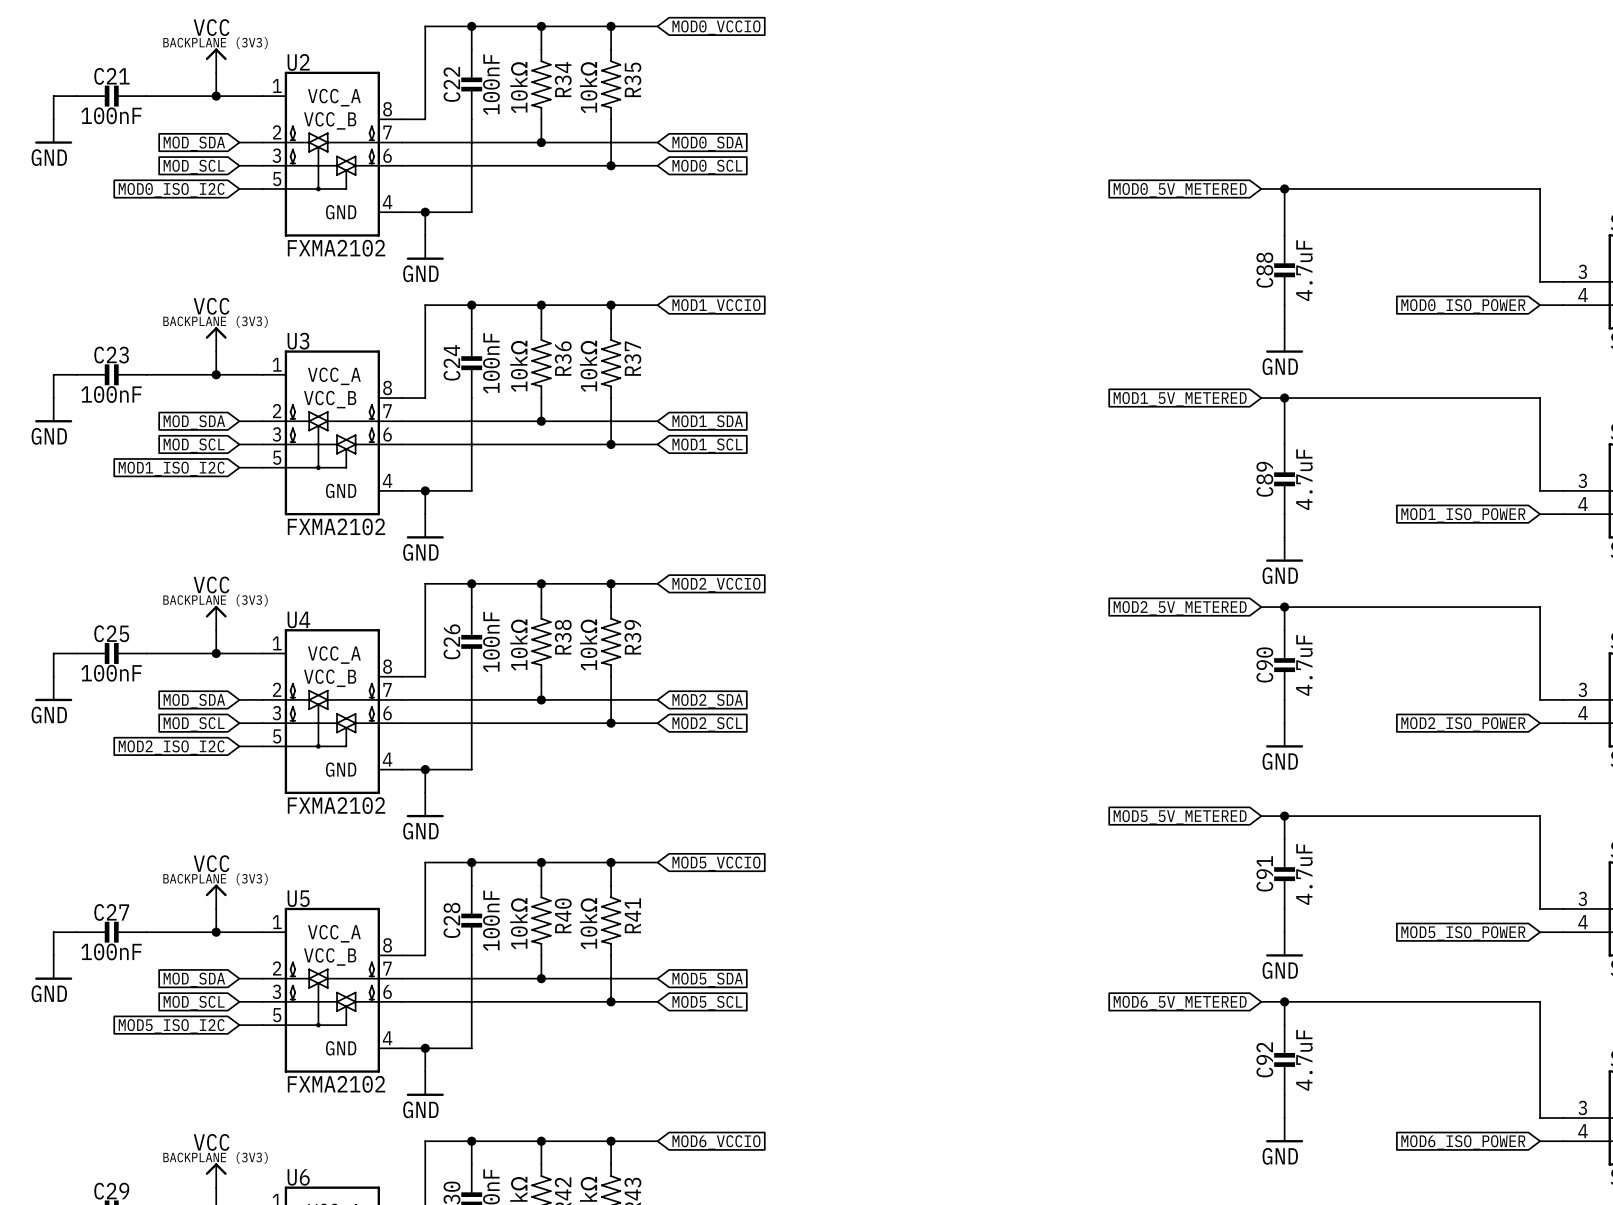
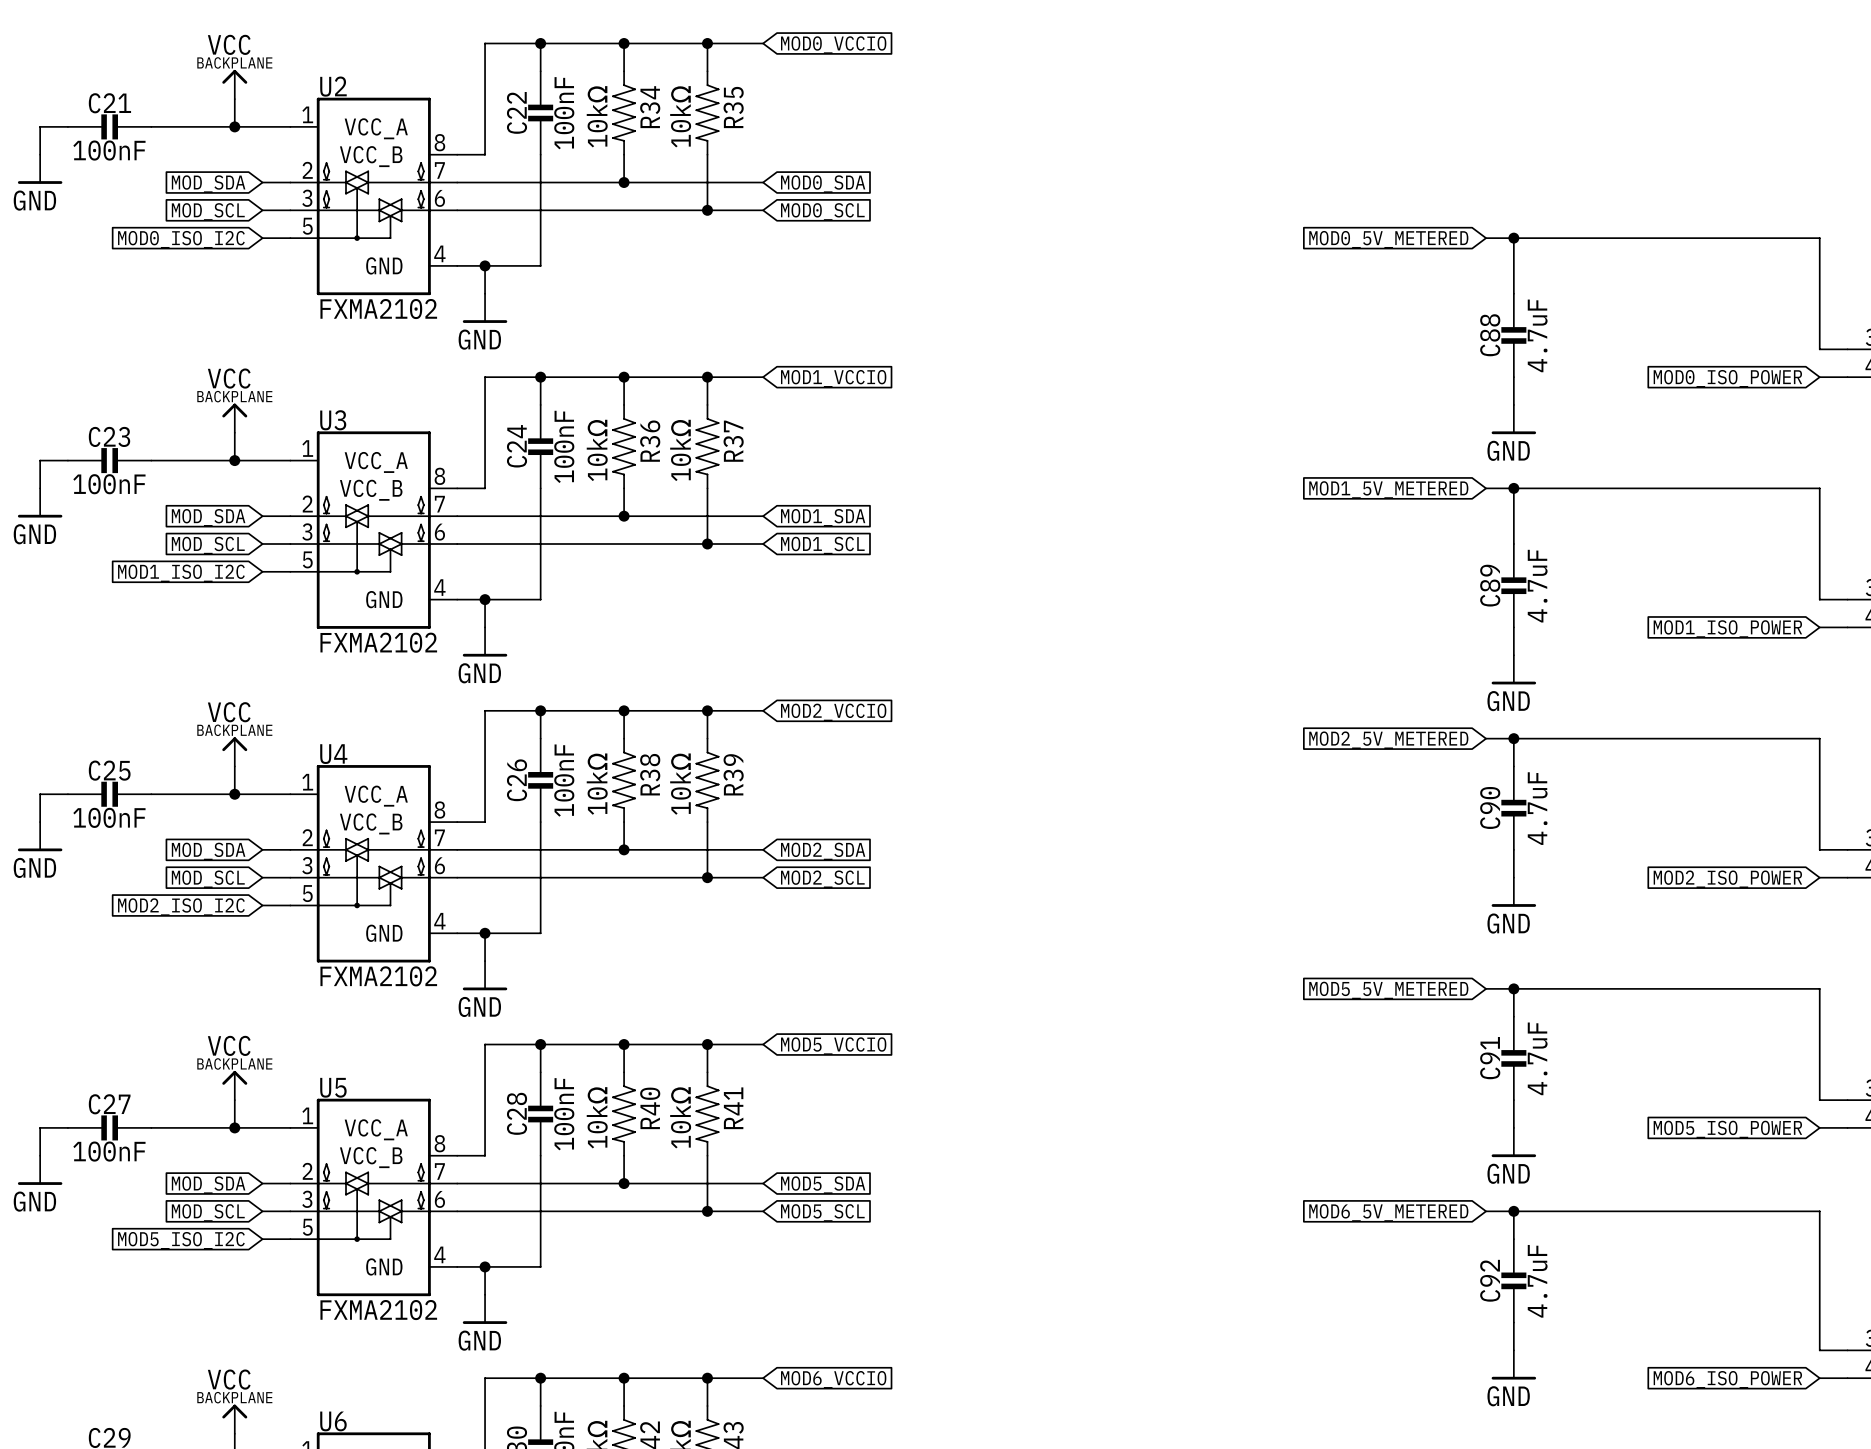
power symbol text: BACKPLANE (3V3) (215, 43) -> BACKPLANE (234, 62)
power symbol text: BACKPLANE (3V3) (215, 321) -> BACKPLANE (234, 396)
power symbol text: BACKPLANE (3V3) (215, 600) -> BACKPLANE (234, 730)
power symbol text: BACKPLANE (3V3) (215, 879) -> BACKPLANE (234, 1063)
power symbol text: BACKPLANE (3V3) (215, 1157) -> BACKPLANE (234, 1397)

